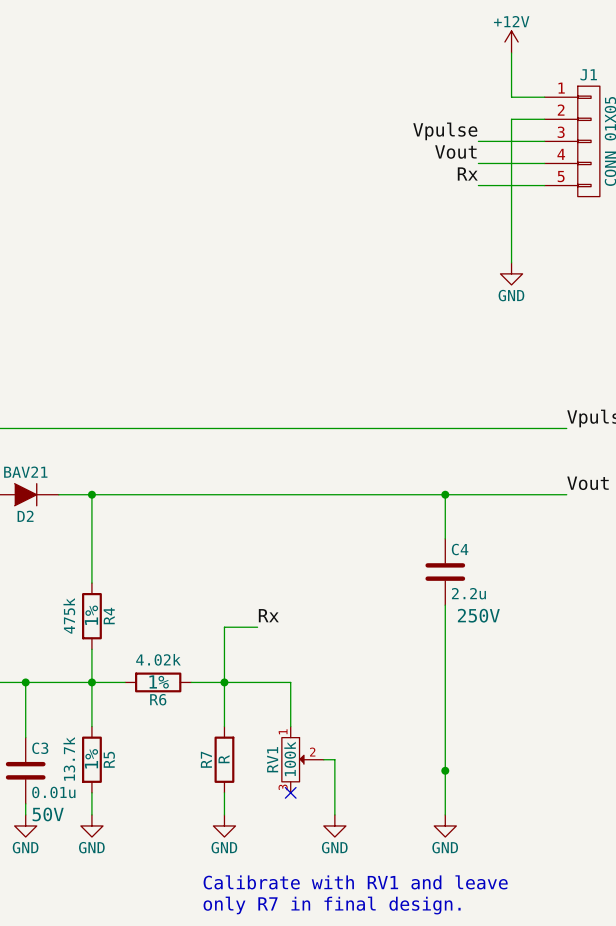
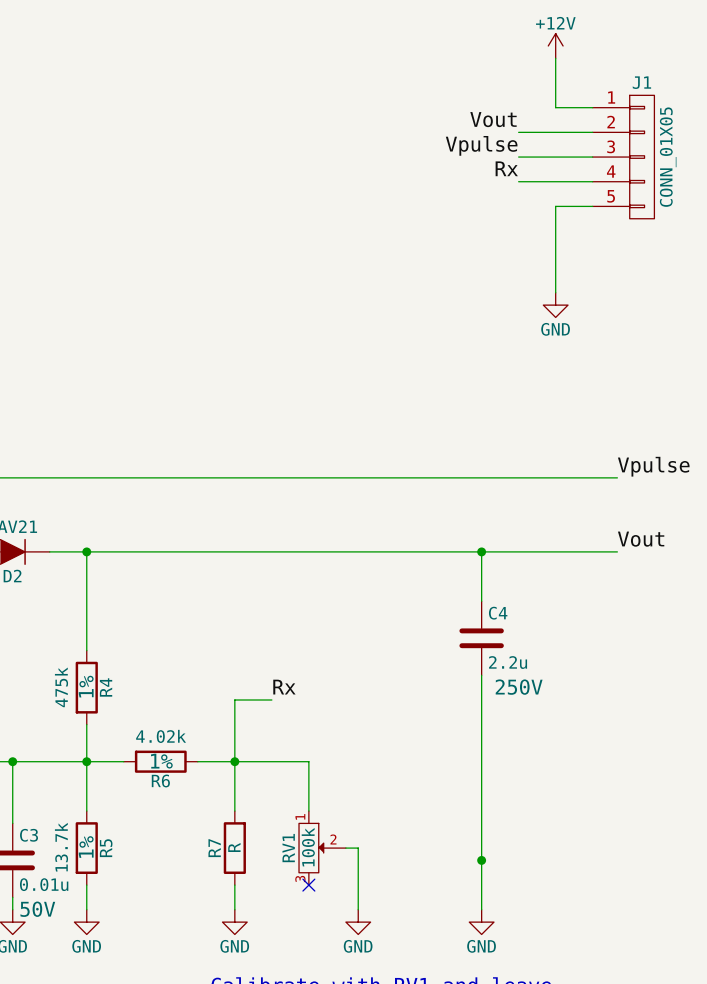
label: none -> Vout (493, 119)
wire: (511, 119) (511, 185) (478, 185) -> (555, 132) (518, 132)
label: Vout (455, 152) -> Rx (506, 168)
label: Rx (467, 173) -> none

